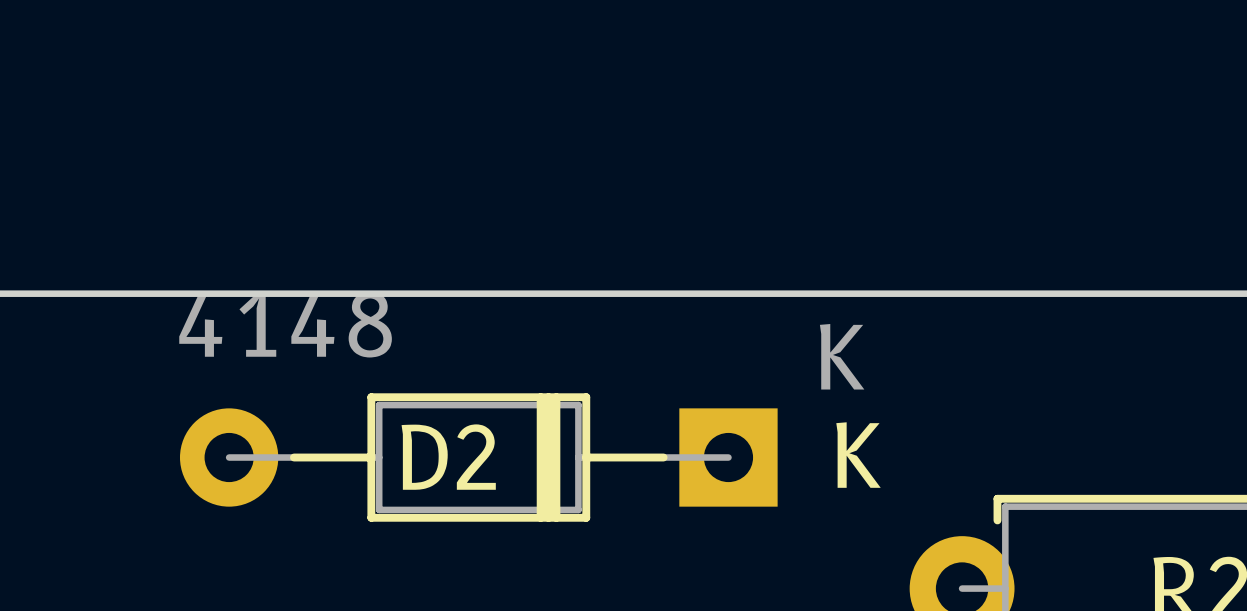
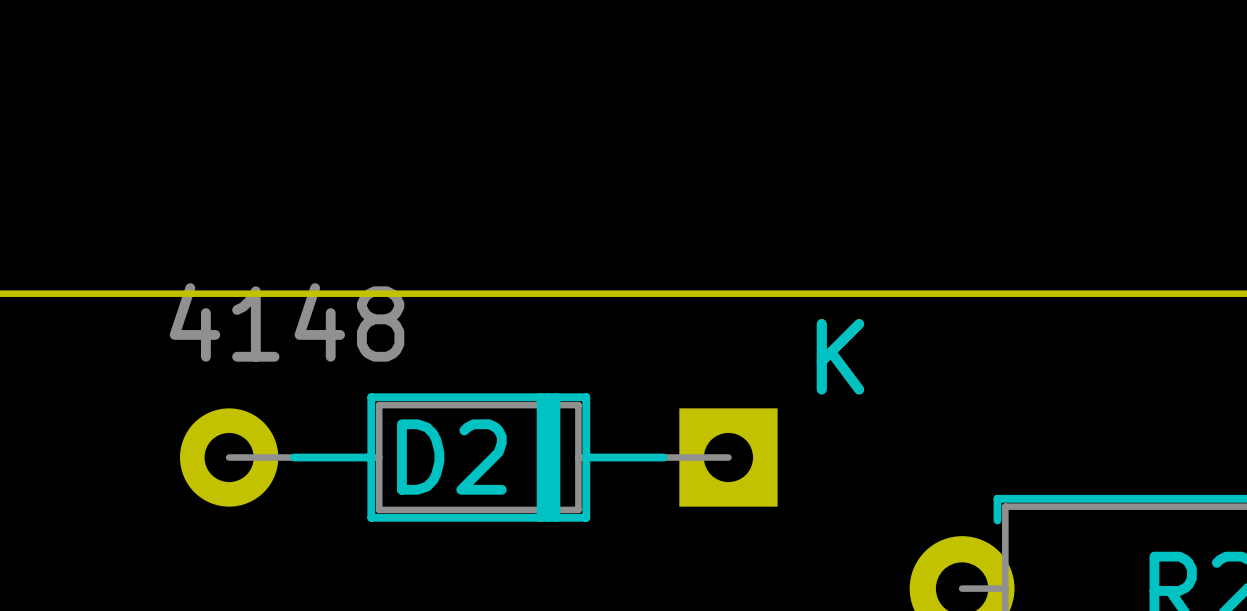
D2 footprint: [179, 393, 778, 522] -> [179, 393, 778, 522]

